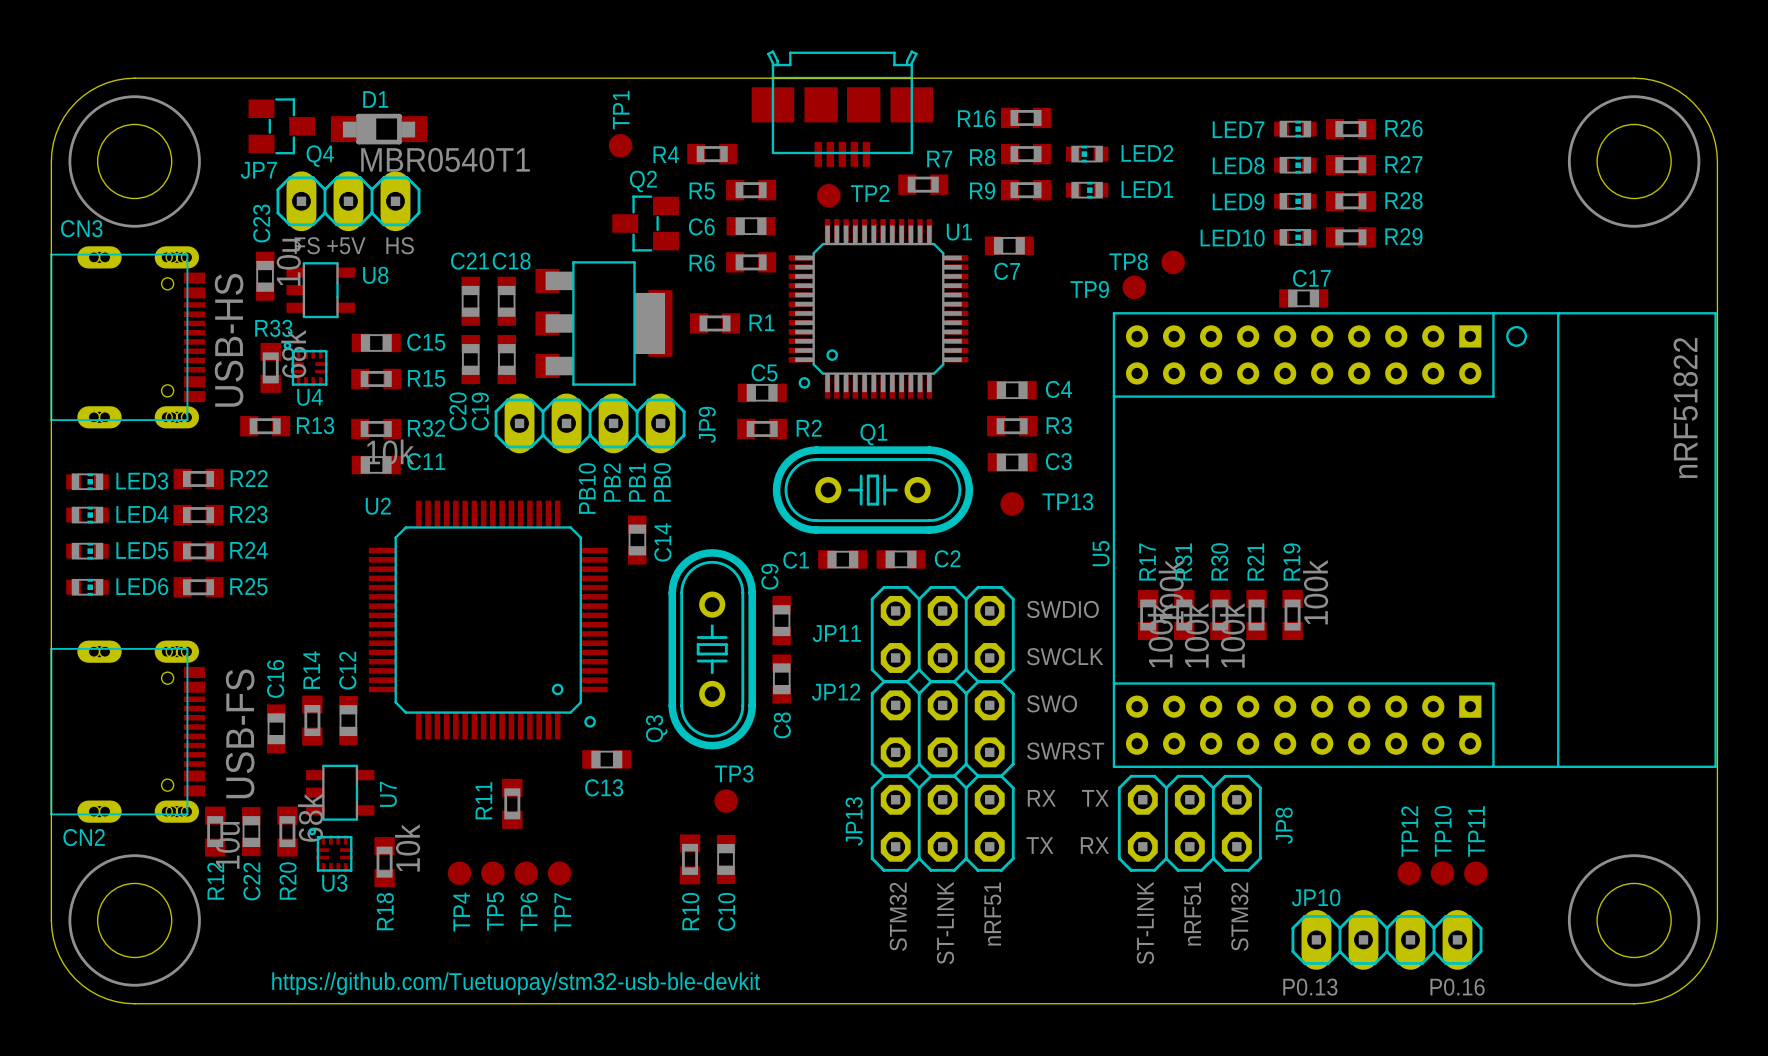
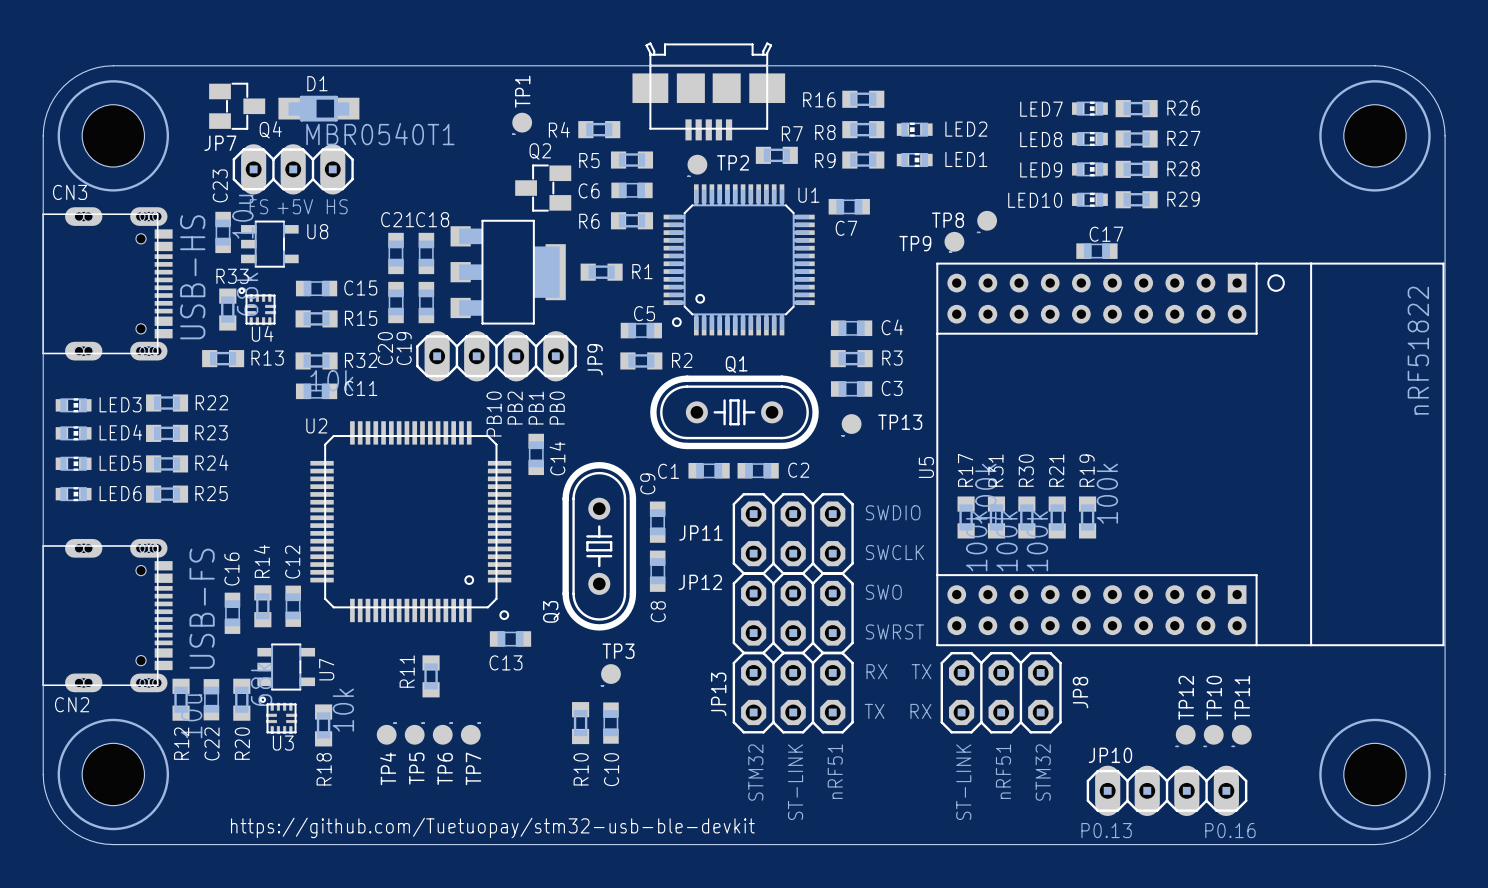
U2 footprint: [368, 500, 608, 740] -> [310, 421, 512, 623]

